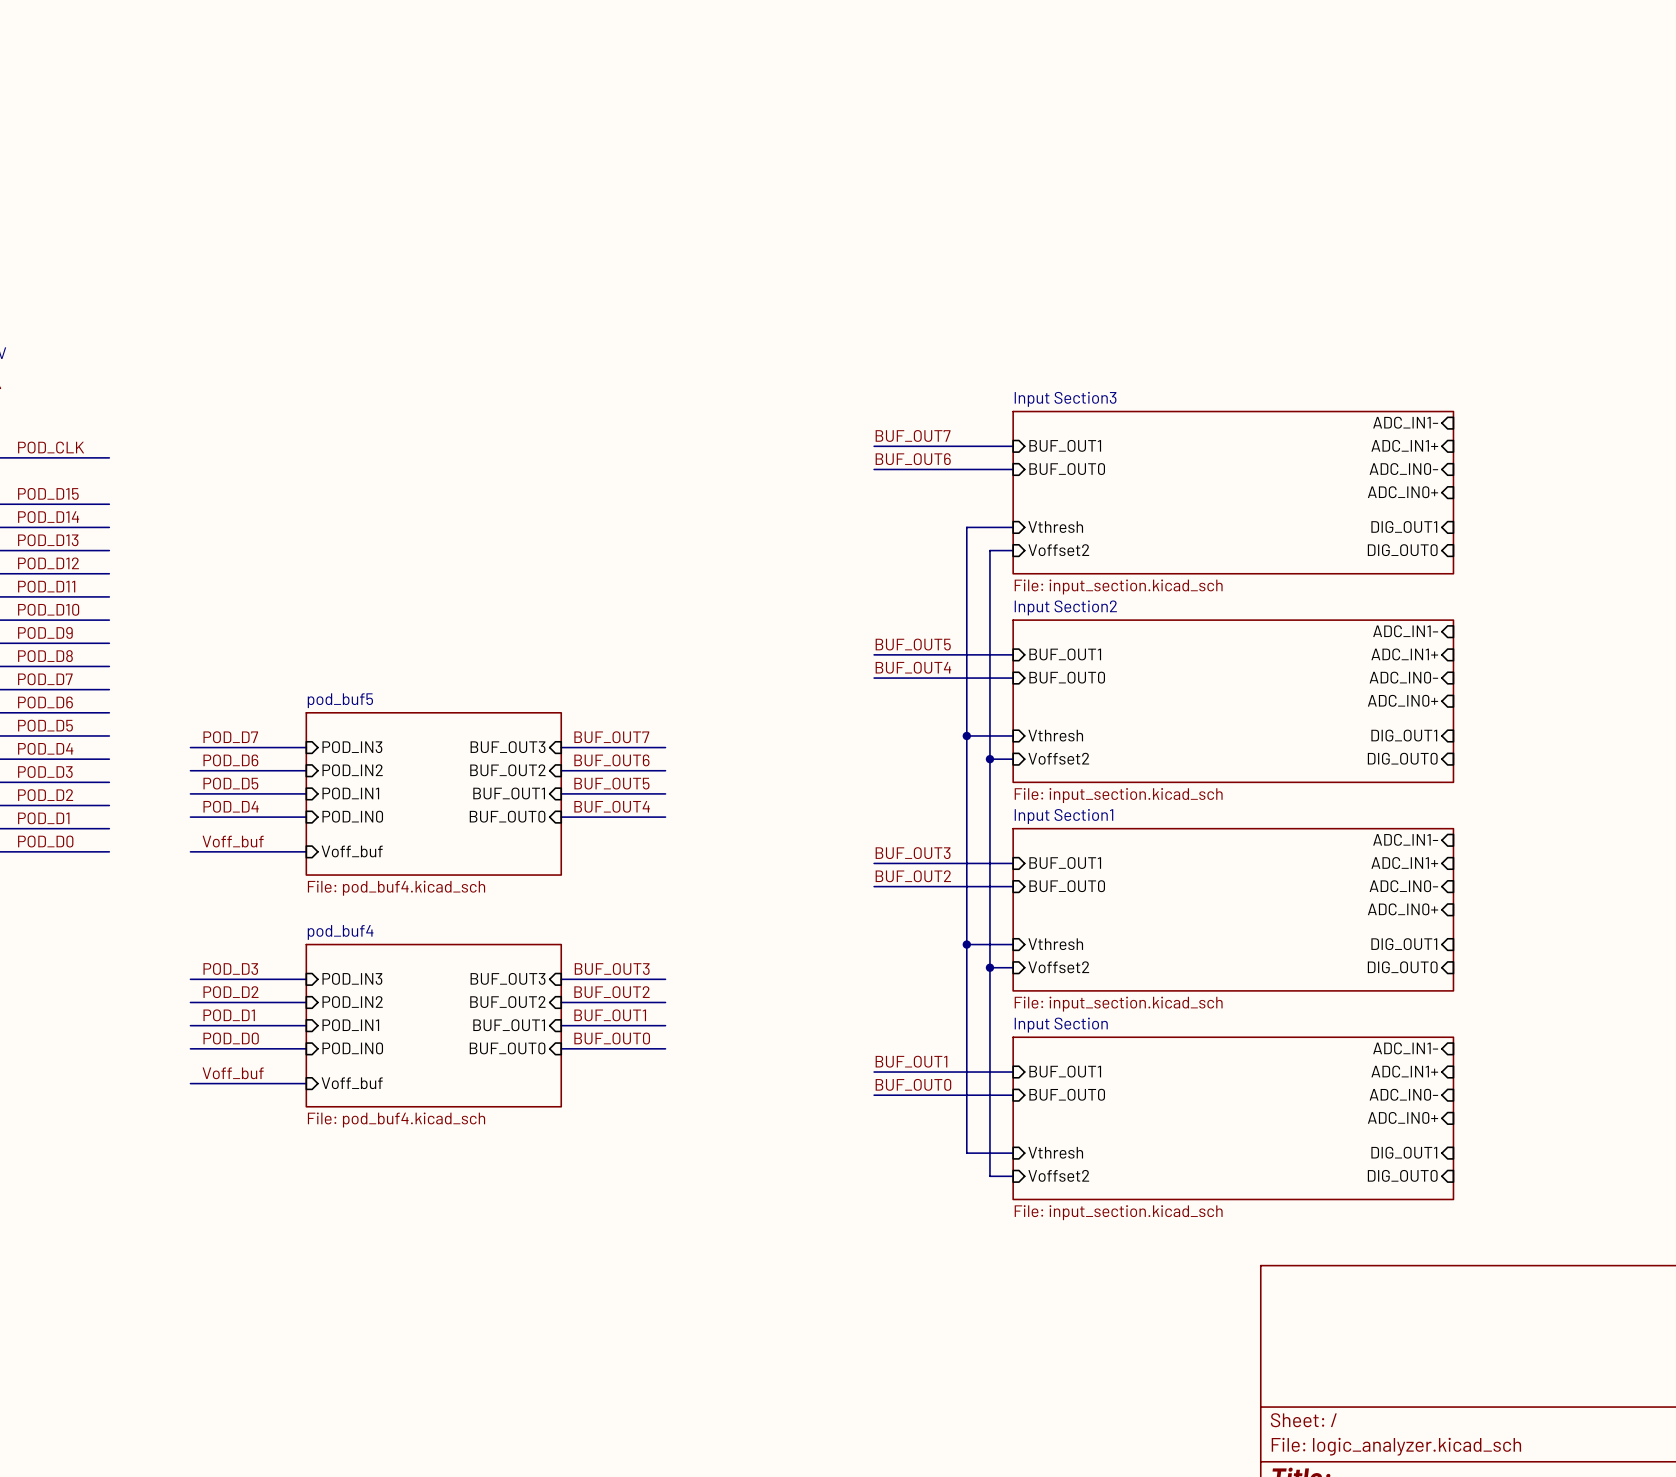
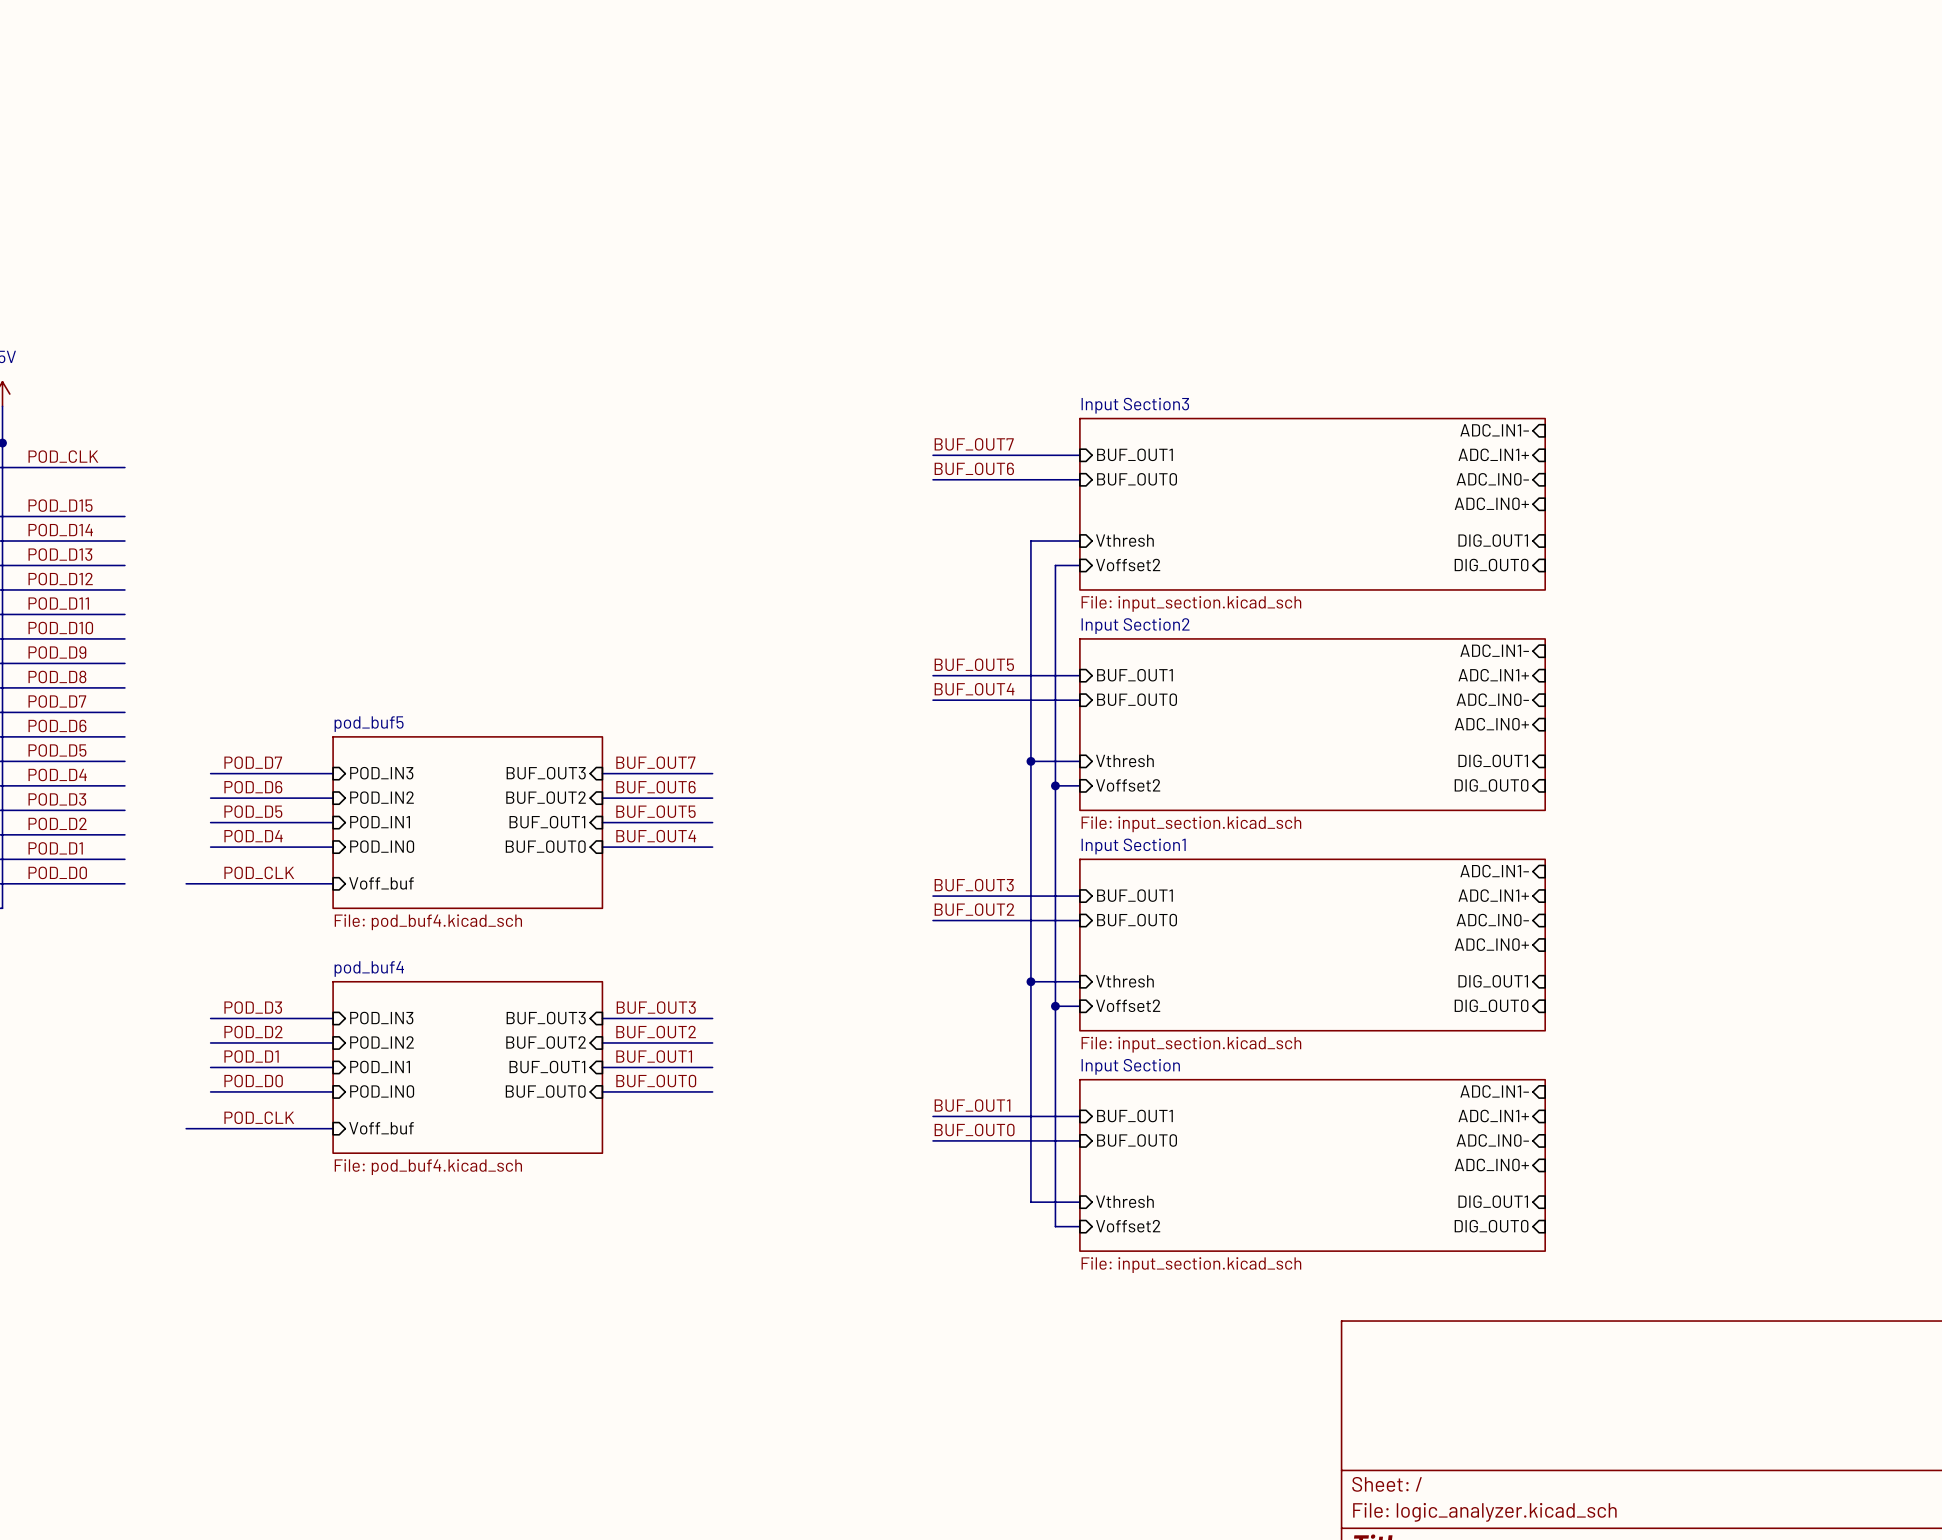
label: Voff_buf (233, 841) -> POD_CLK (259, 872)
wire: none -> (186, 883) (210, 883)
label: Voff_buf (233, 1073) -> POD_CLK (259, 1117)
wire: none -> (186, 1128) (210, 1128)

